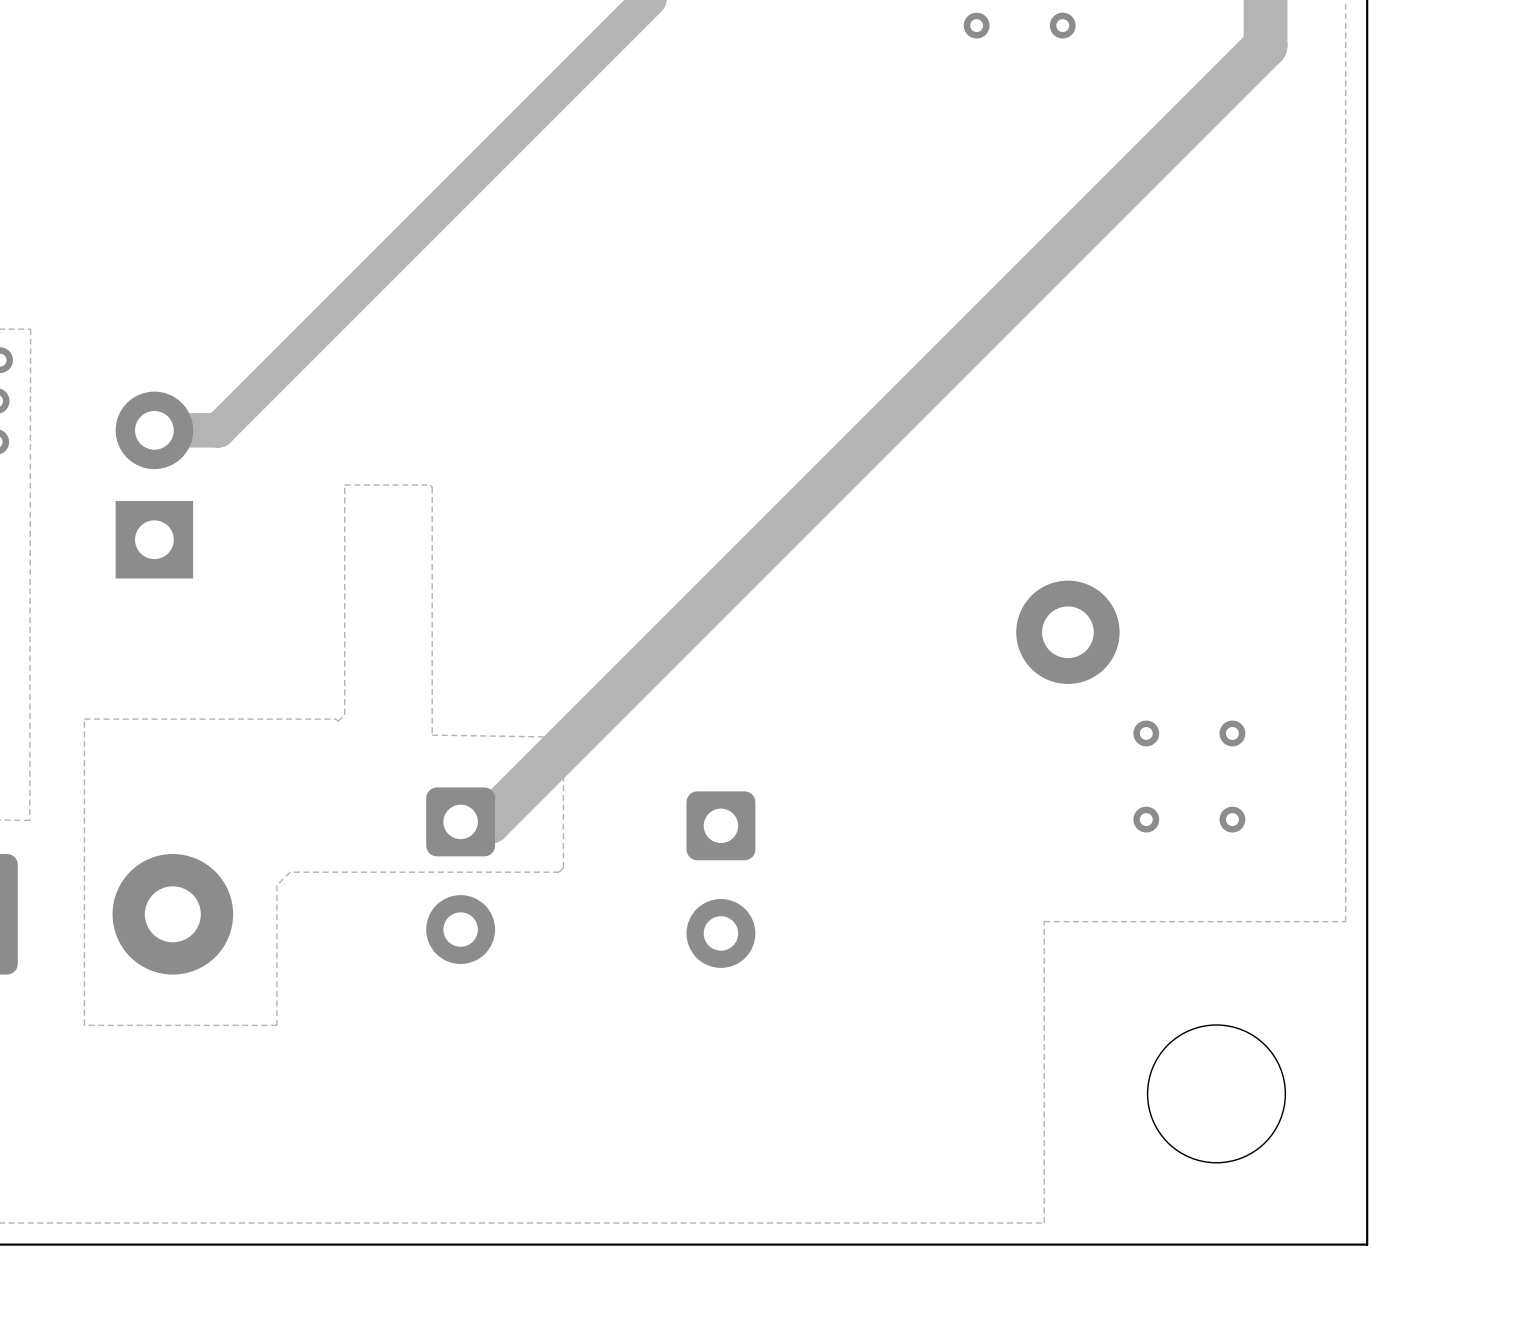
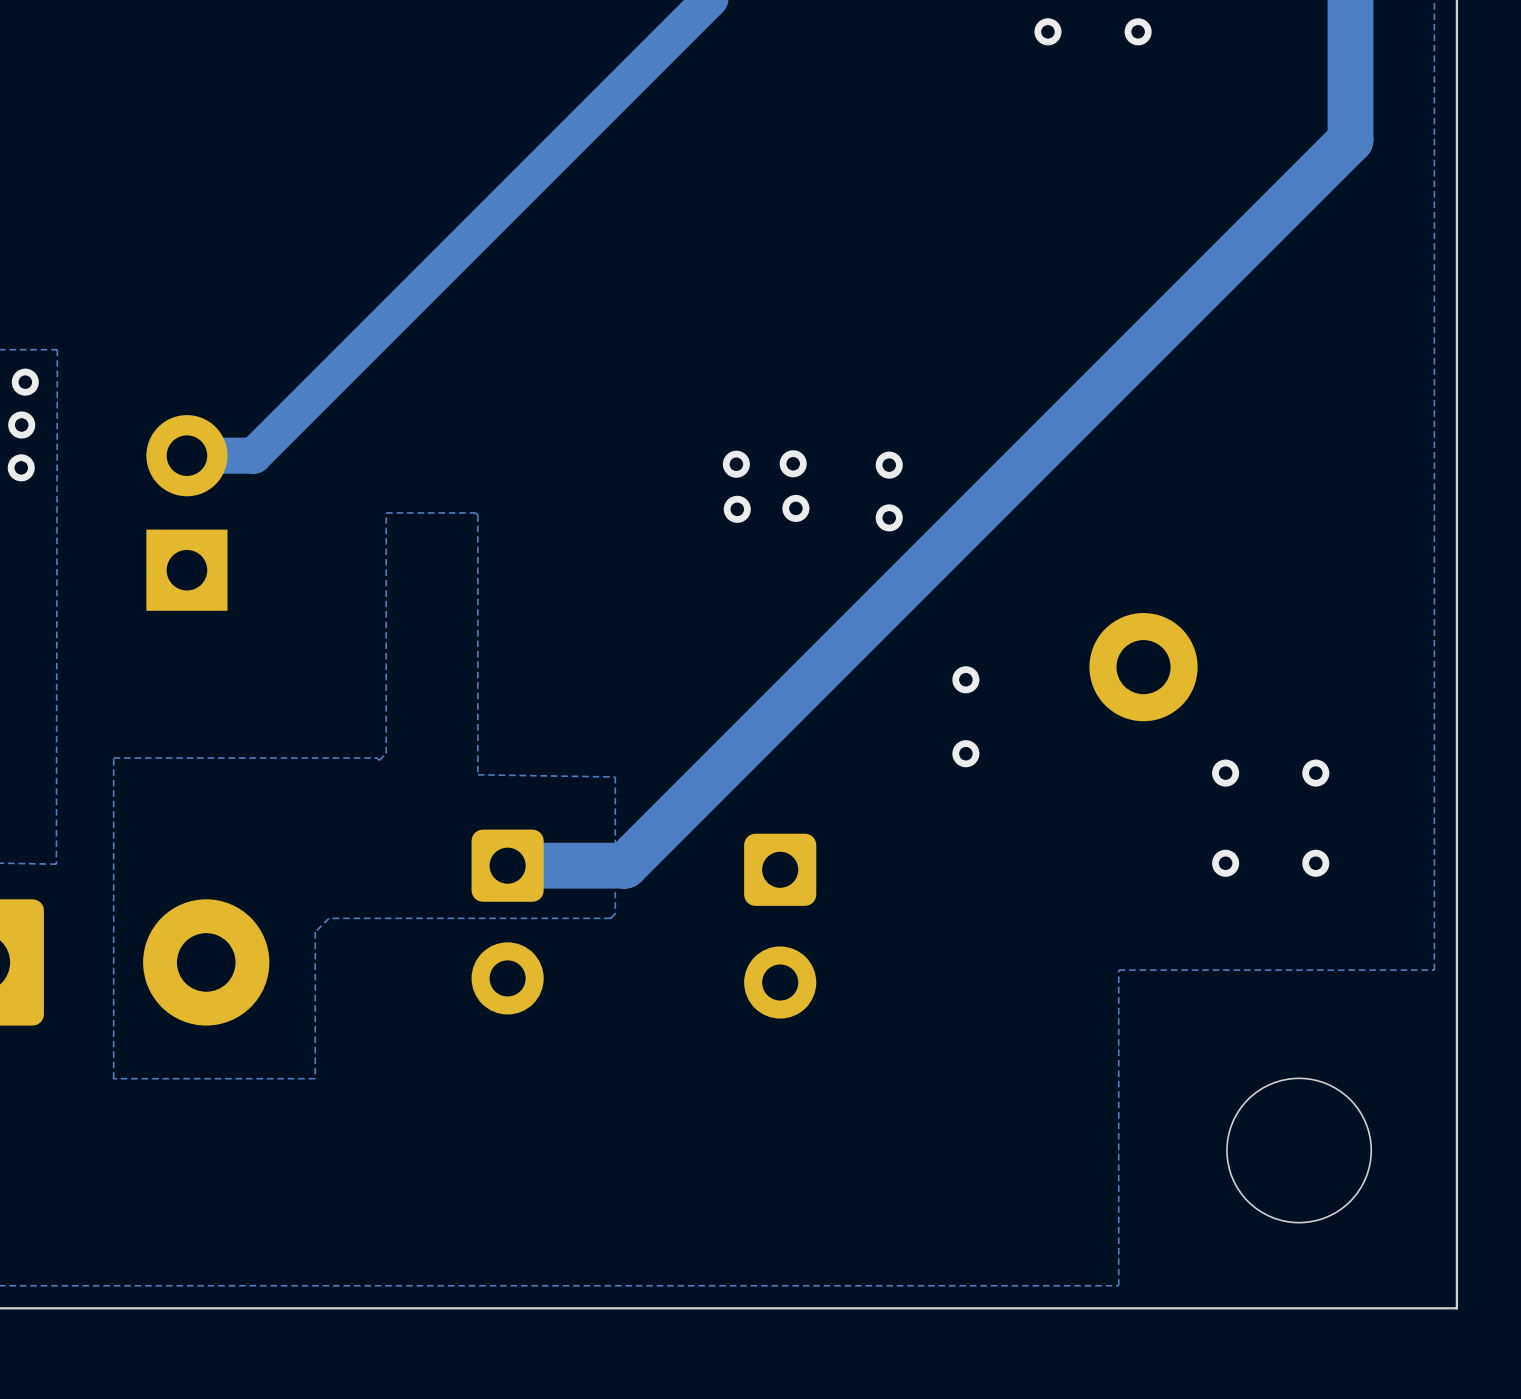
track: (1265, 45) (489, 821) -> (1350, 53) (1350, 140) (624, 865) (537, 865)
via: none -> (736, 464)
via: none -> (793, 463)
via: none -> (889, 465)
via: none -> (795, 508)
via: none -> (737, 509)
via: none -> (889, 517)
via: none -> (965, 679)
via: none -> (965, 753)

